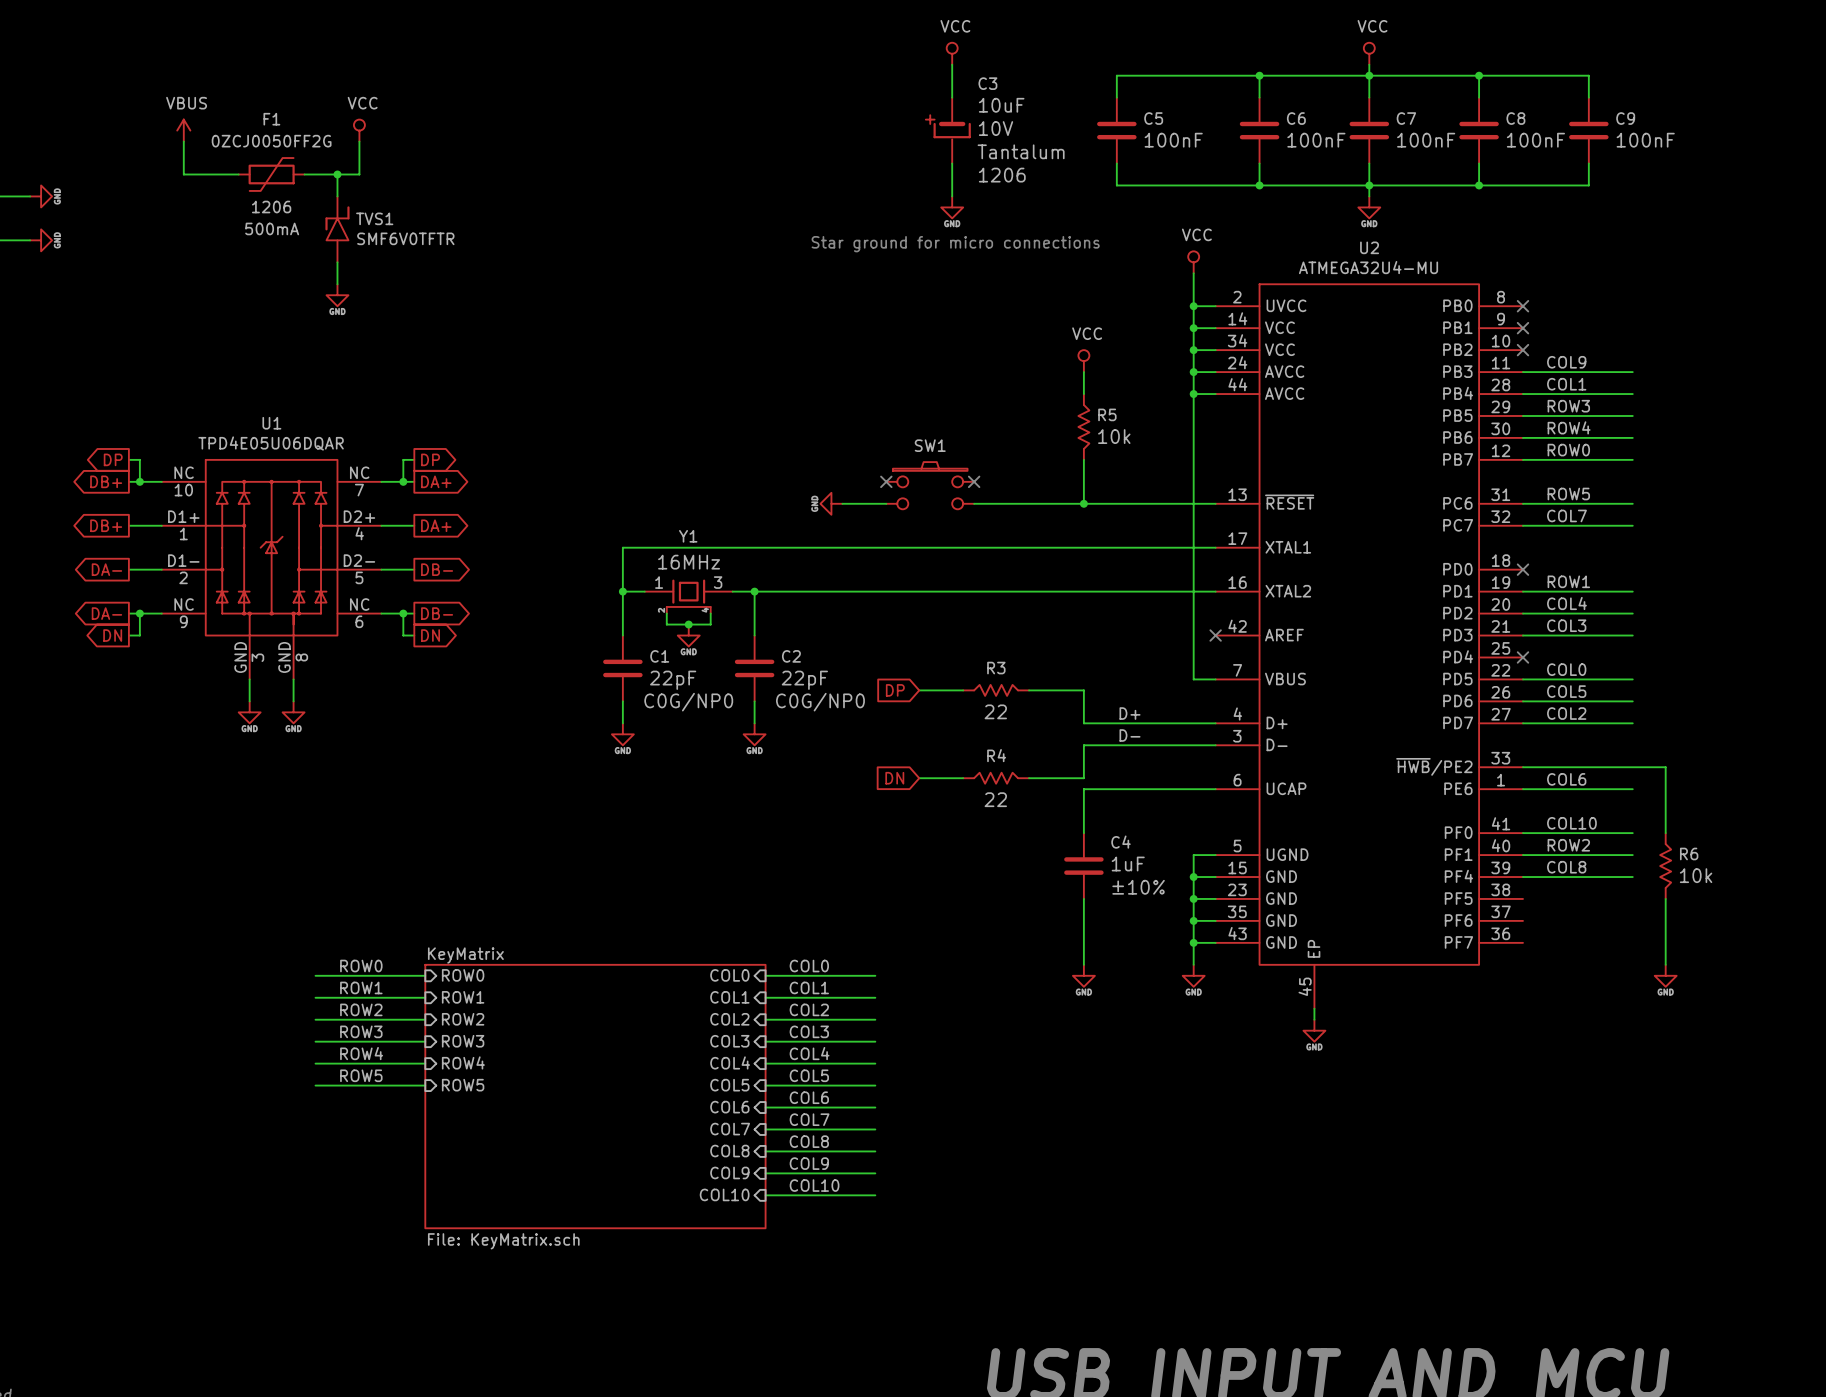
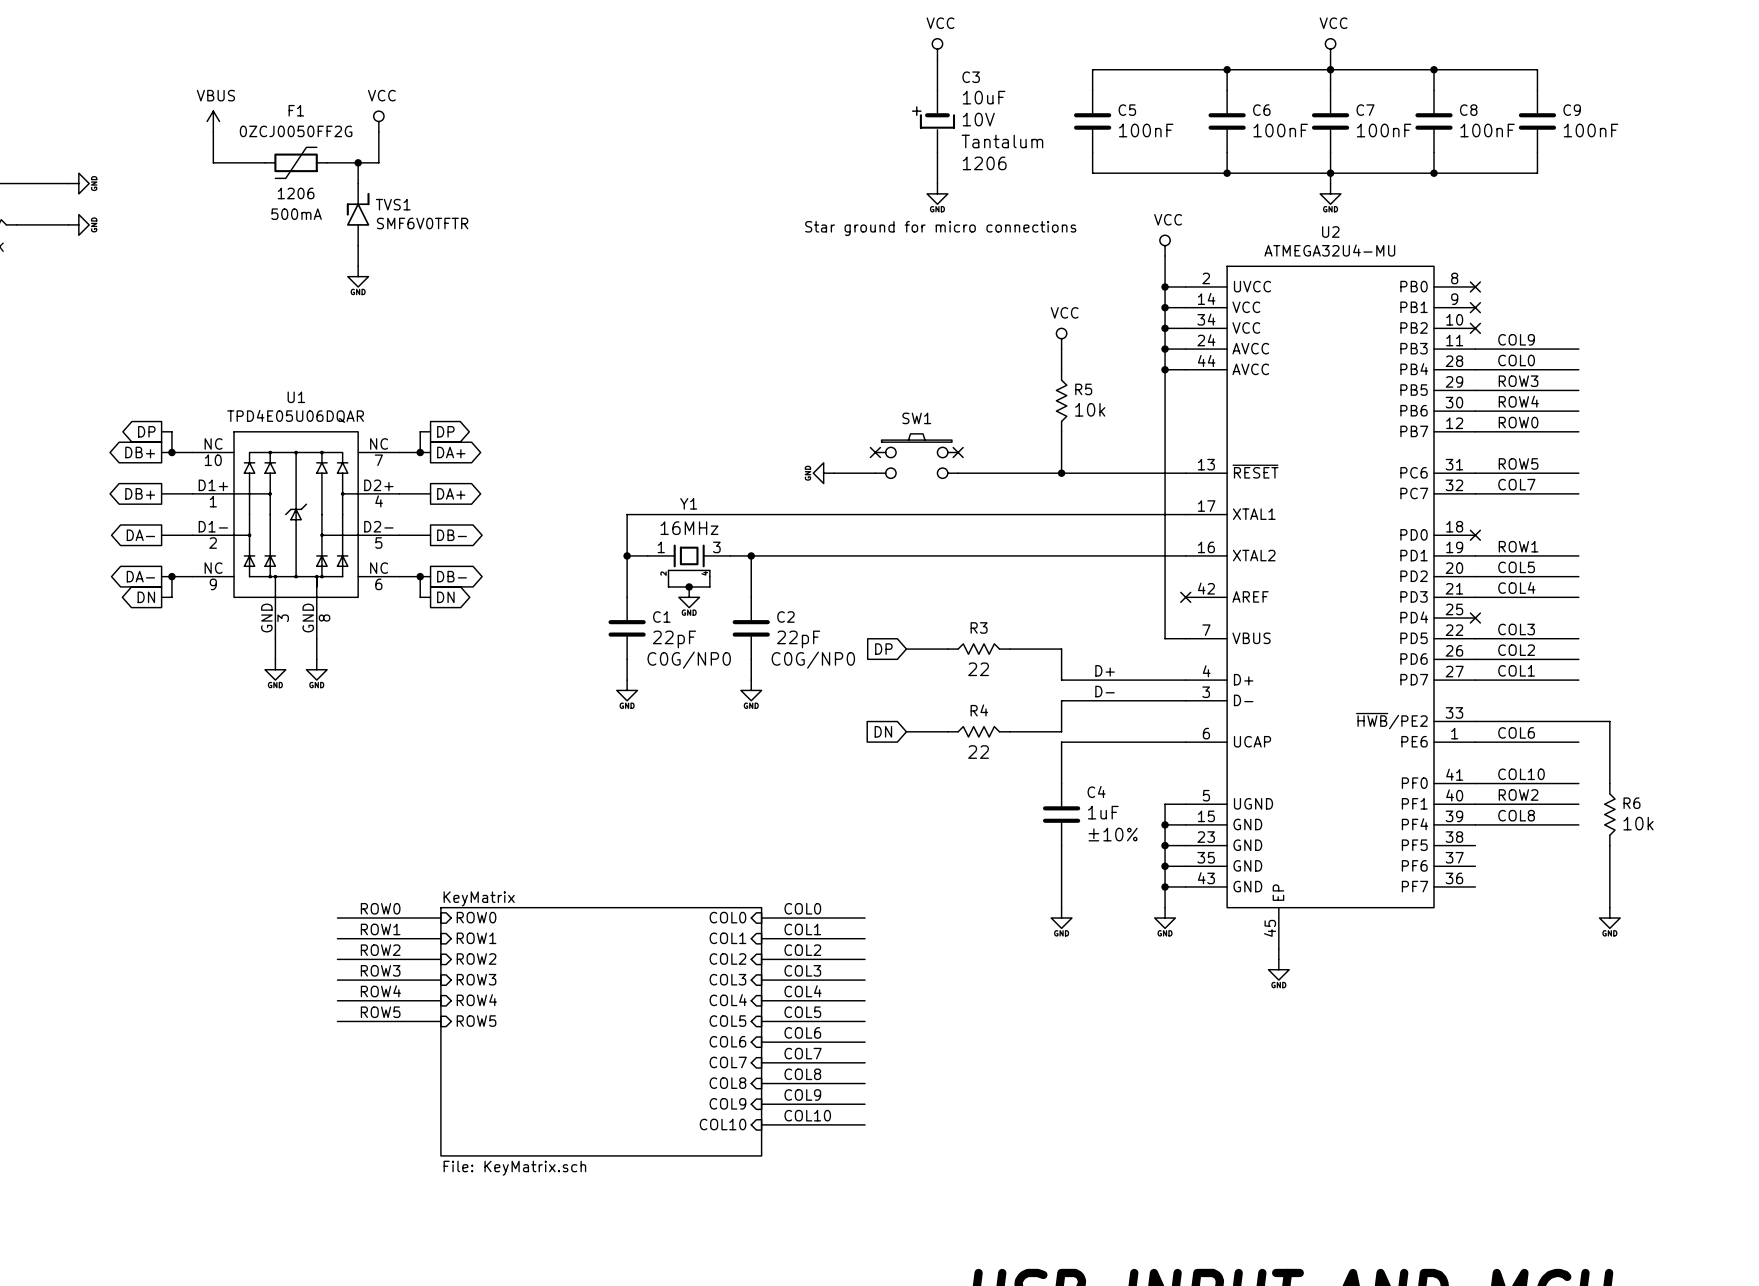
label: COL1 (1566, 384) -> COL0 (1516, 360)
label: COL4 (1566, 603) -> COL5 (1516, 567)
label: COL3 (1566, 625) -> COL4 (1516, 587)
label: COL0 (1566, 669) -> COL3 (1516, 629)
label: COL5 (1566, 691) -> COL2 (1516, 650)
label: COL2 (1566, 713) -> COL1 (1516, 670)

